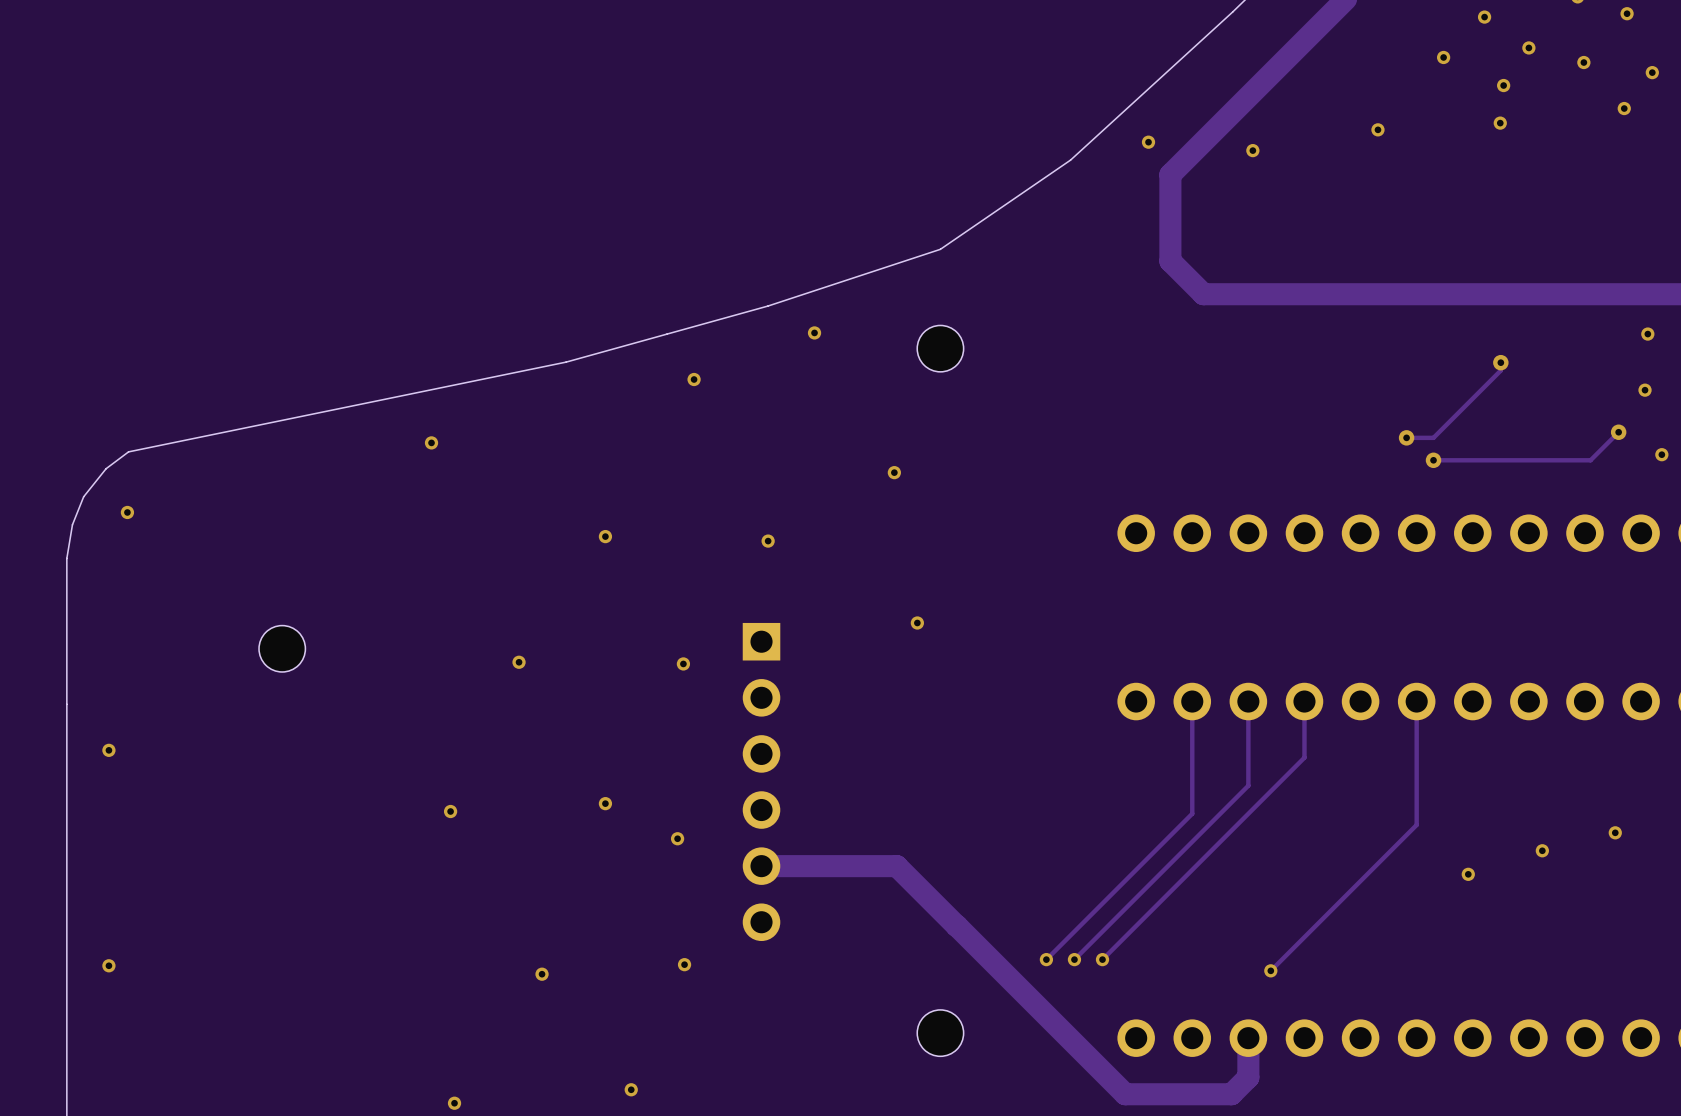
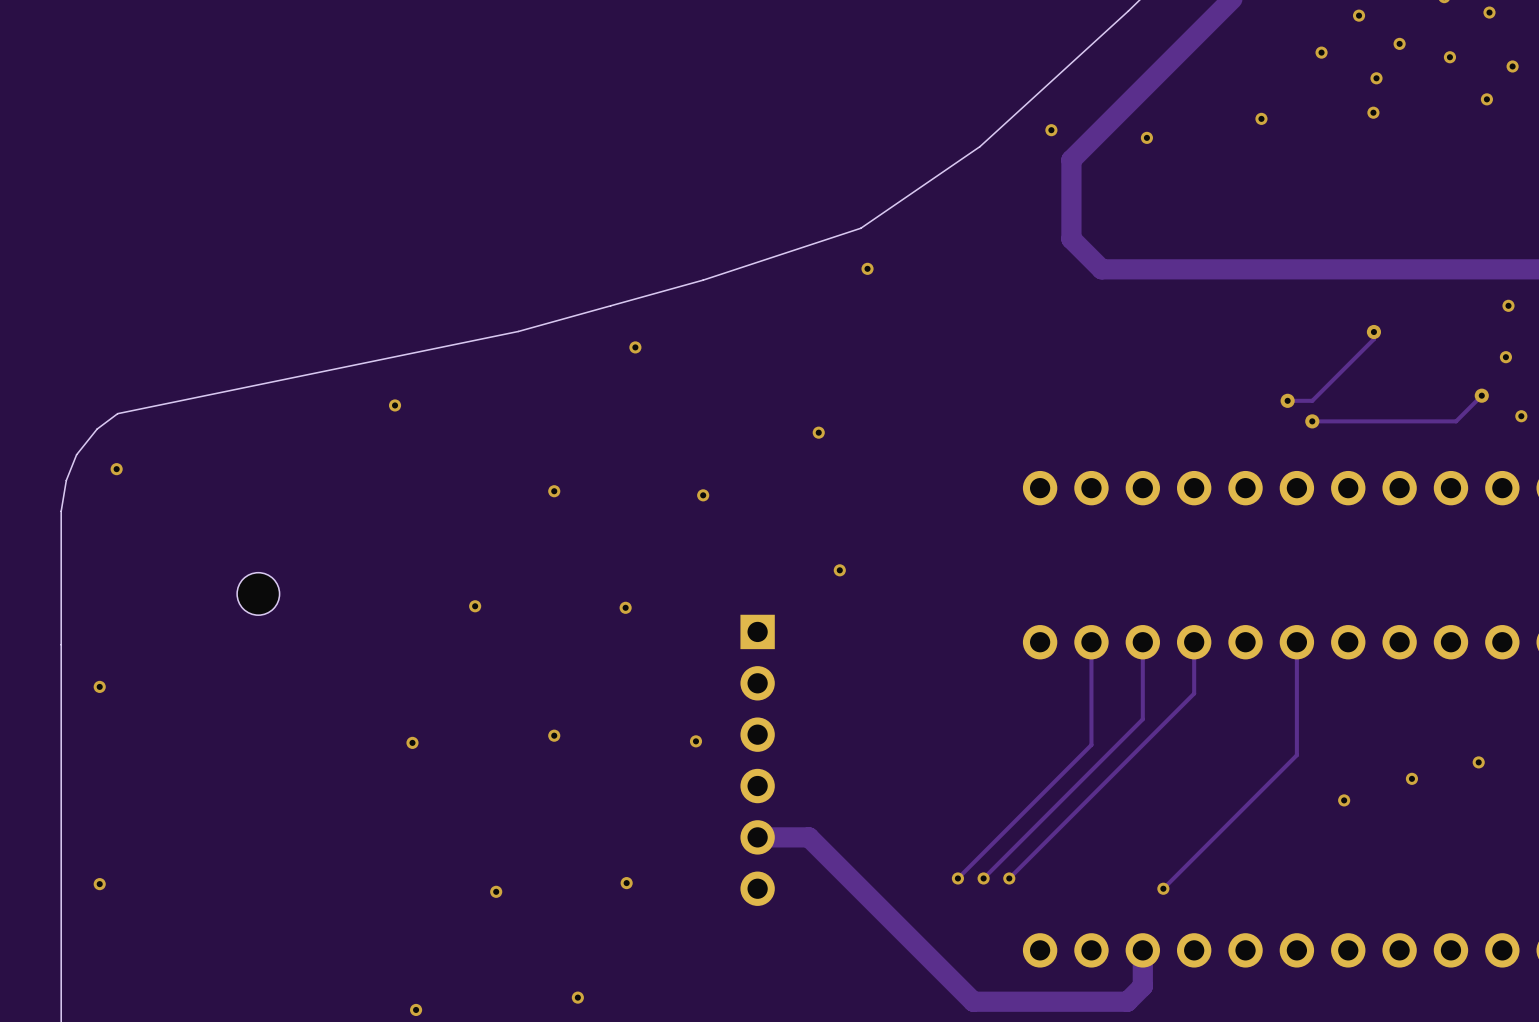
via: none -> (867, 268)
via: (814, 332) -> none
part: (940, 348) -> none
part position: (761, 781) -> (757, 760)
via position: (677, 838) -> (695, 741)
track: (761, 866) (896, 866) (956, 925) -> none
track: (956, 925) (1125, 1094) -> (757, 837) (808, 837) (973, 1001) (1030, 1001)
part: (940, 1033) -> none

